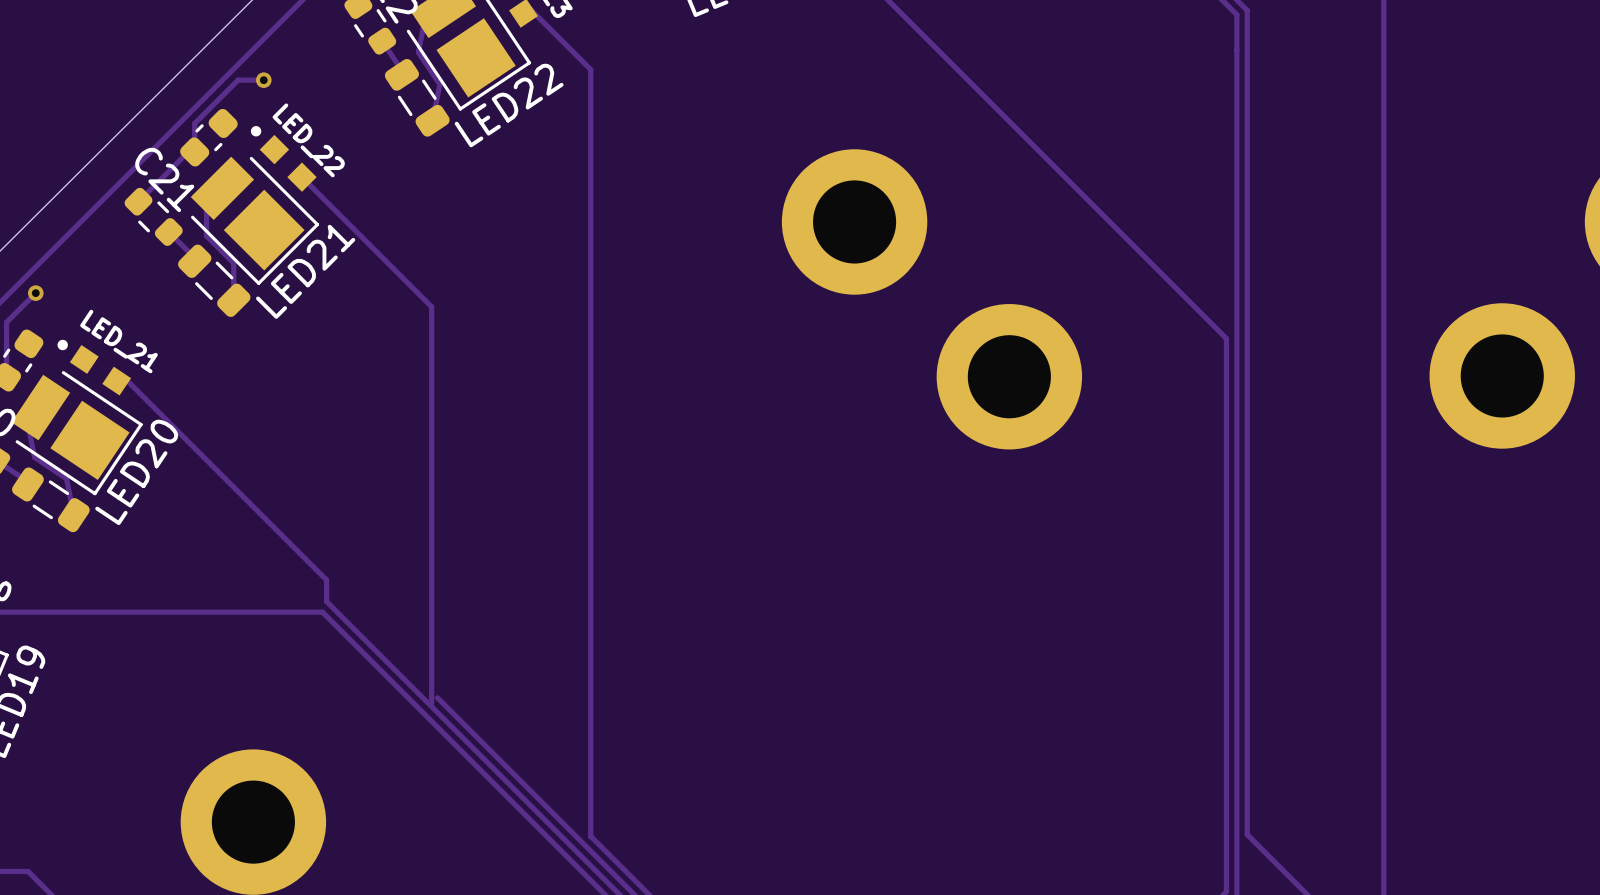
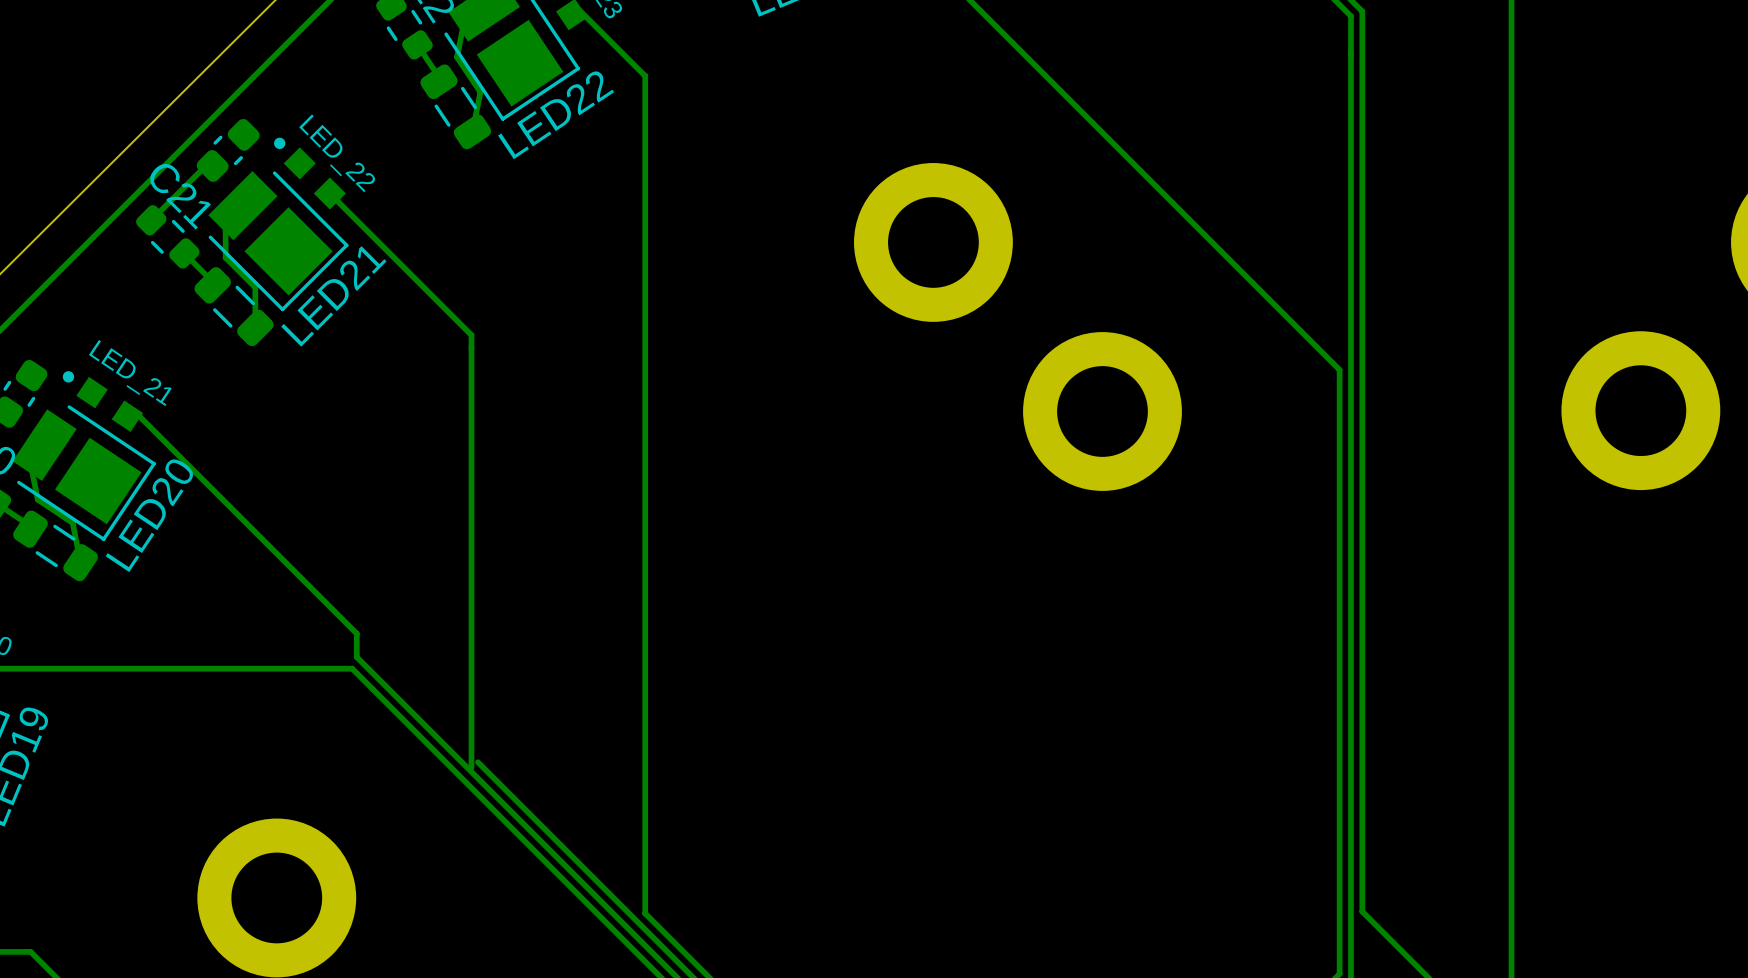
track: (263, 80) (238, 80) (194, 123) (194, 151) -> none
via: (263, 80) -> none
track: (35, 293) (6, 322) (6, 377) -> none
via: (35, 293) -> none

